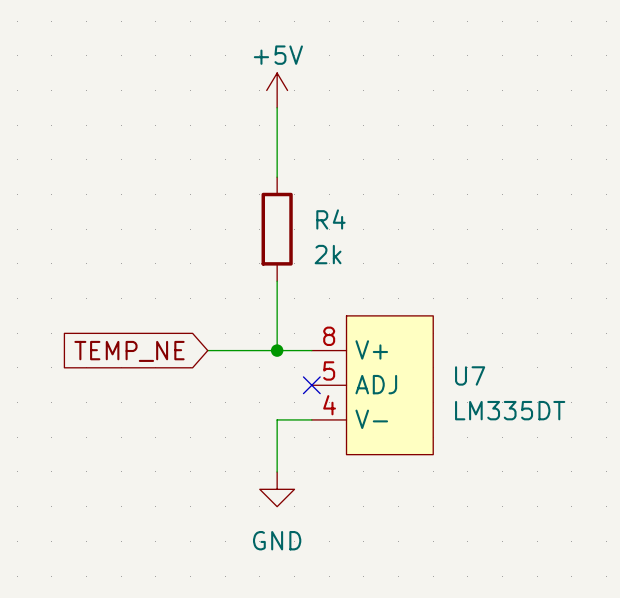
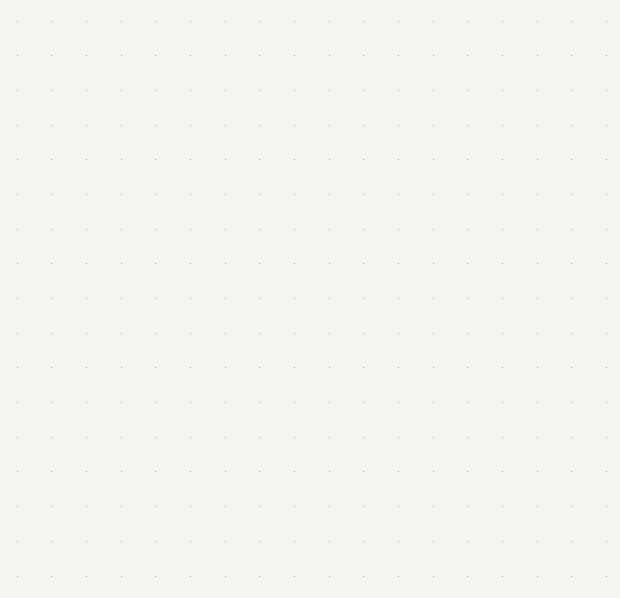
power symbol: +5V (277, 90) -> none
wire: (277, 107) (277, 177) -> none
R4: 2k (277, 229) -> none
wire: (277, 281) (277, 350) -> none
wire: (207, 350) (311, 350) -> none
junction: (277, 350) -> none
global label: TEMP_NE (129, 351) -> none
no-connect mark: (311, 385) -> none
U7: LM335DT (372, 385) -> none
wire: (311, 419) (277, 419) (277, 471) -> none
power symbol: GND (277, 489) -> none

